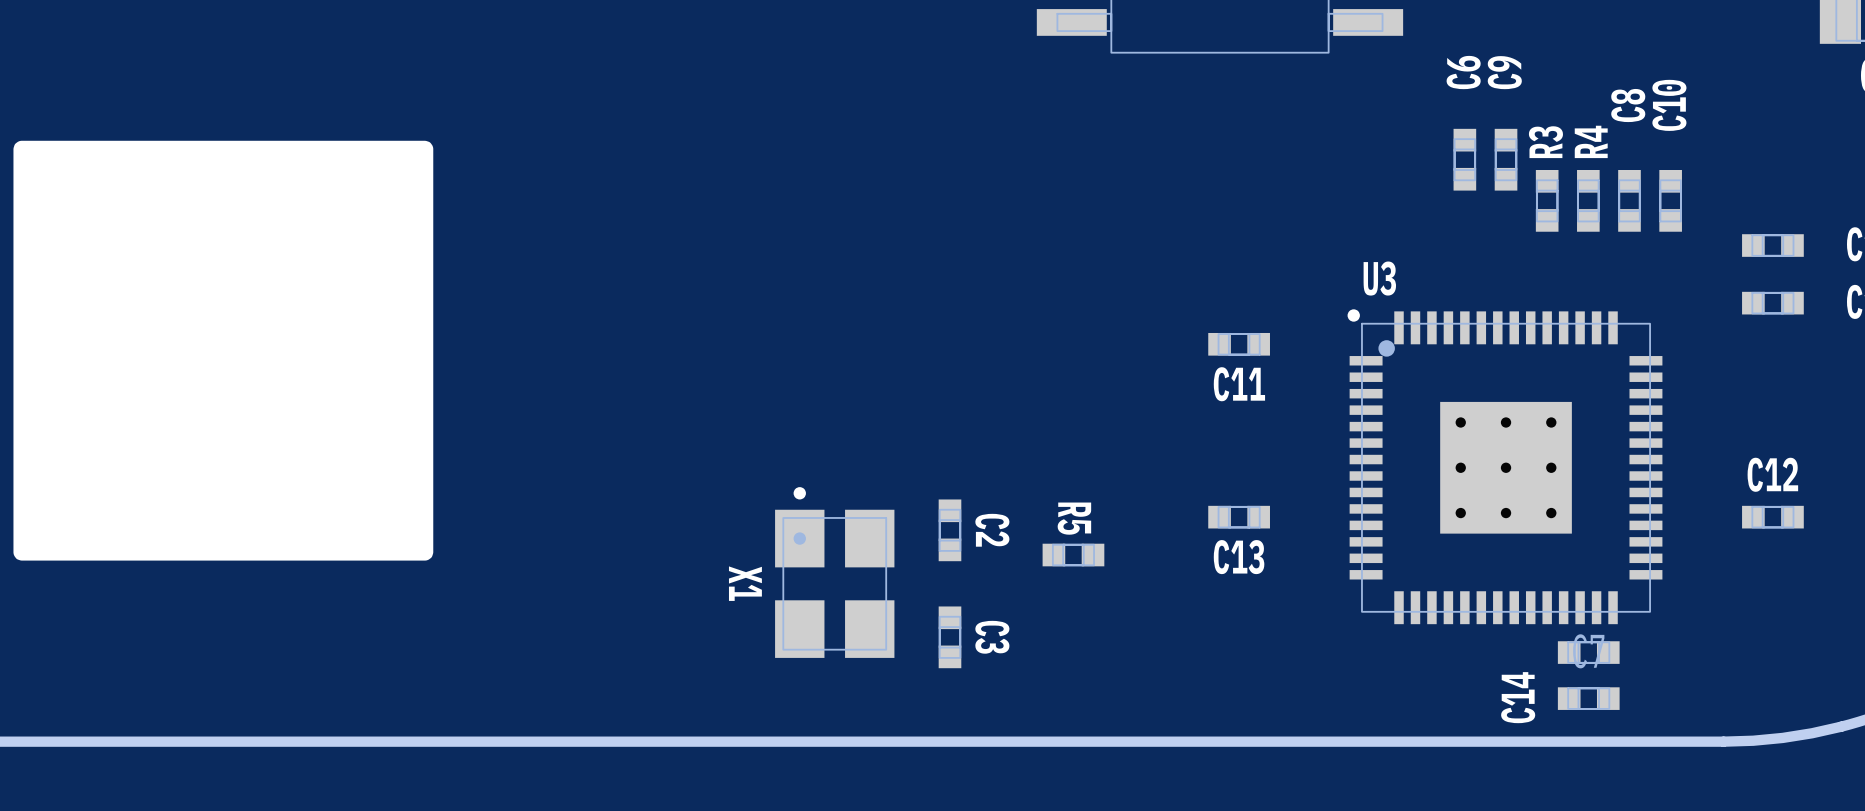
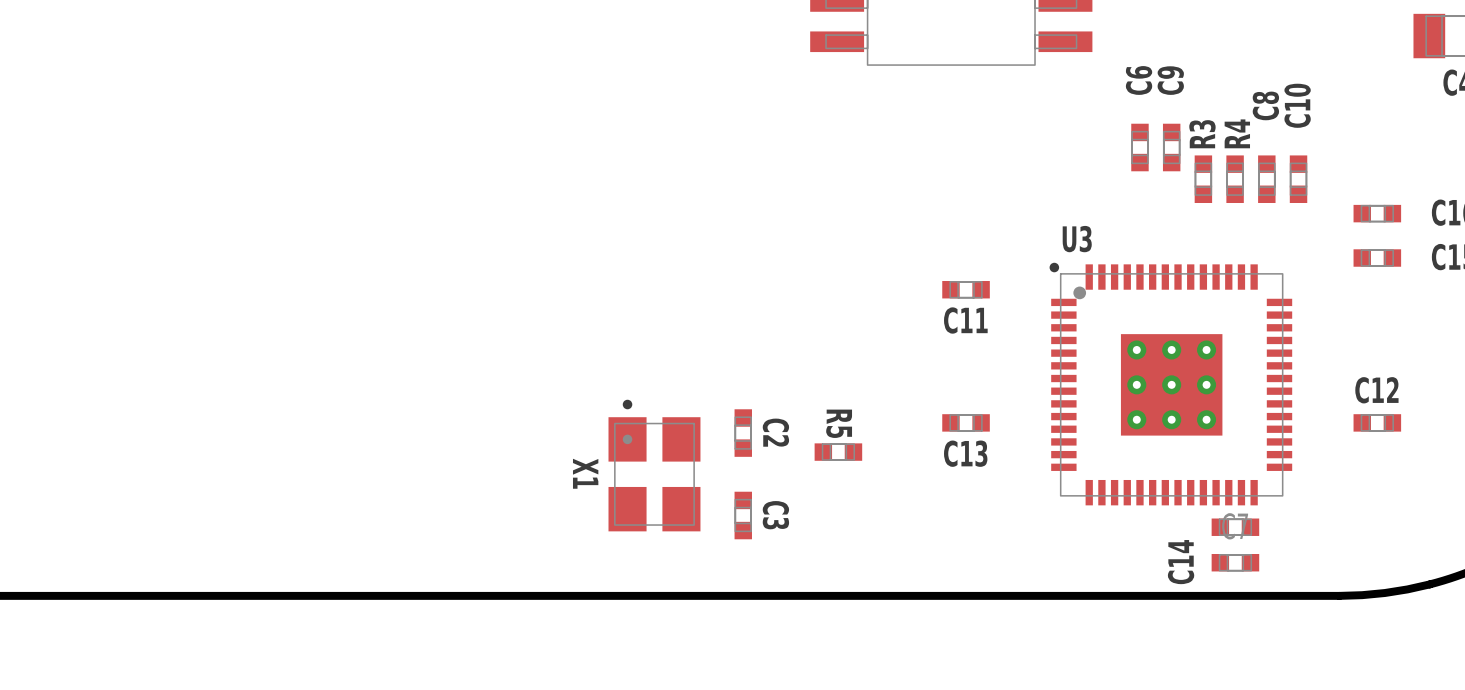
drawing: [13, 140, 434, 561] -> none

